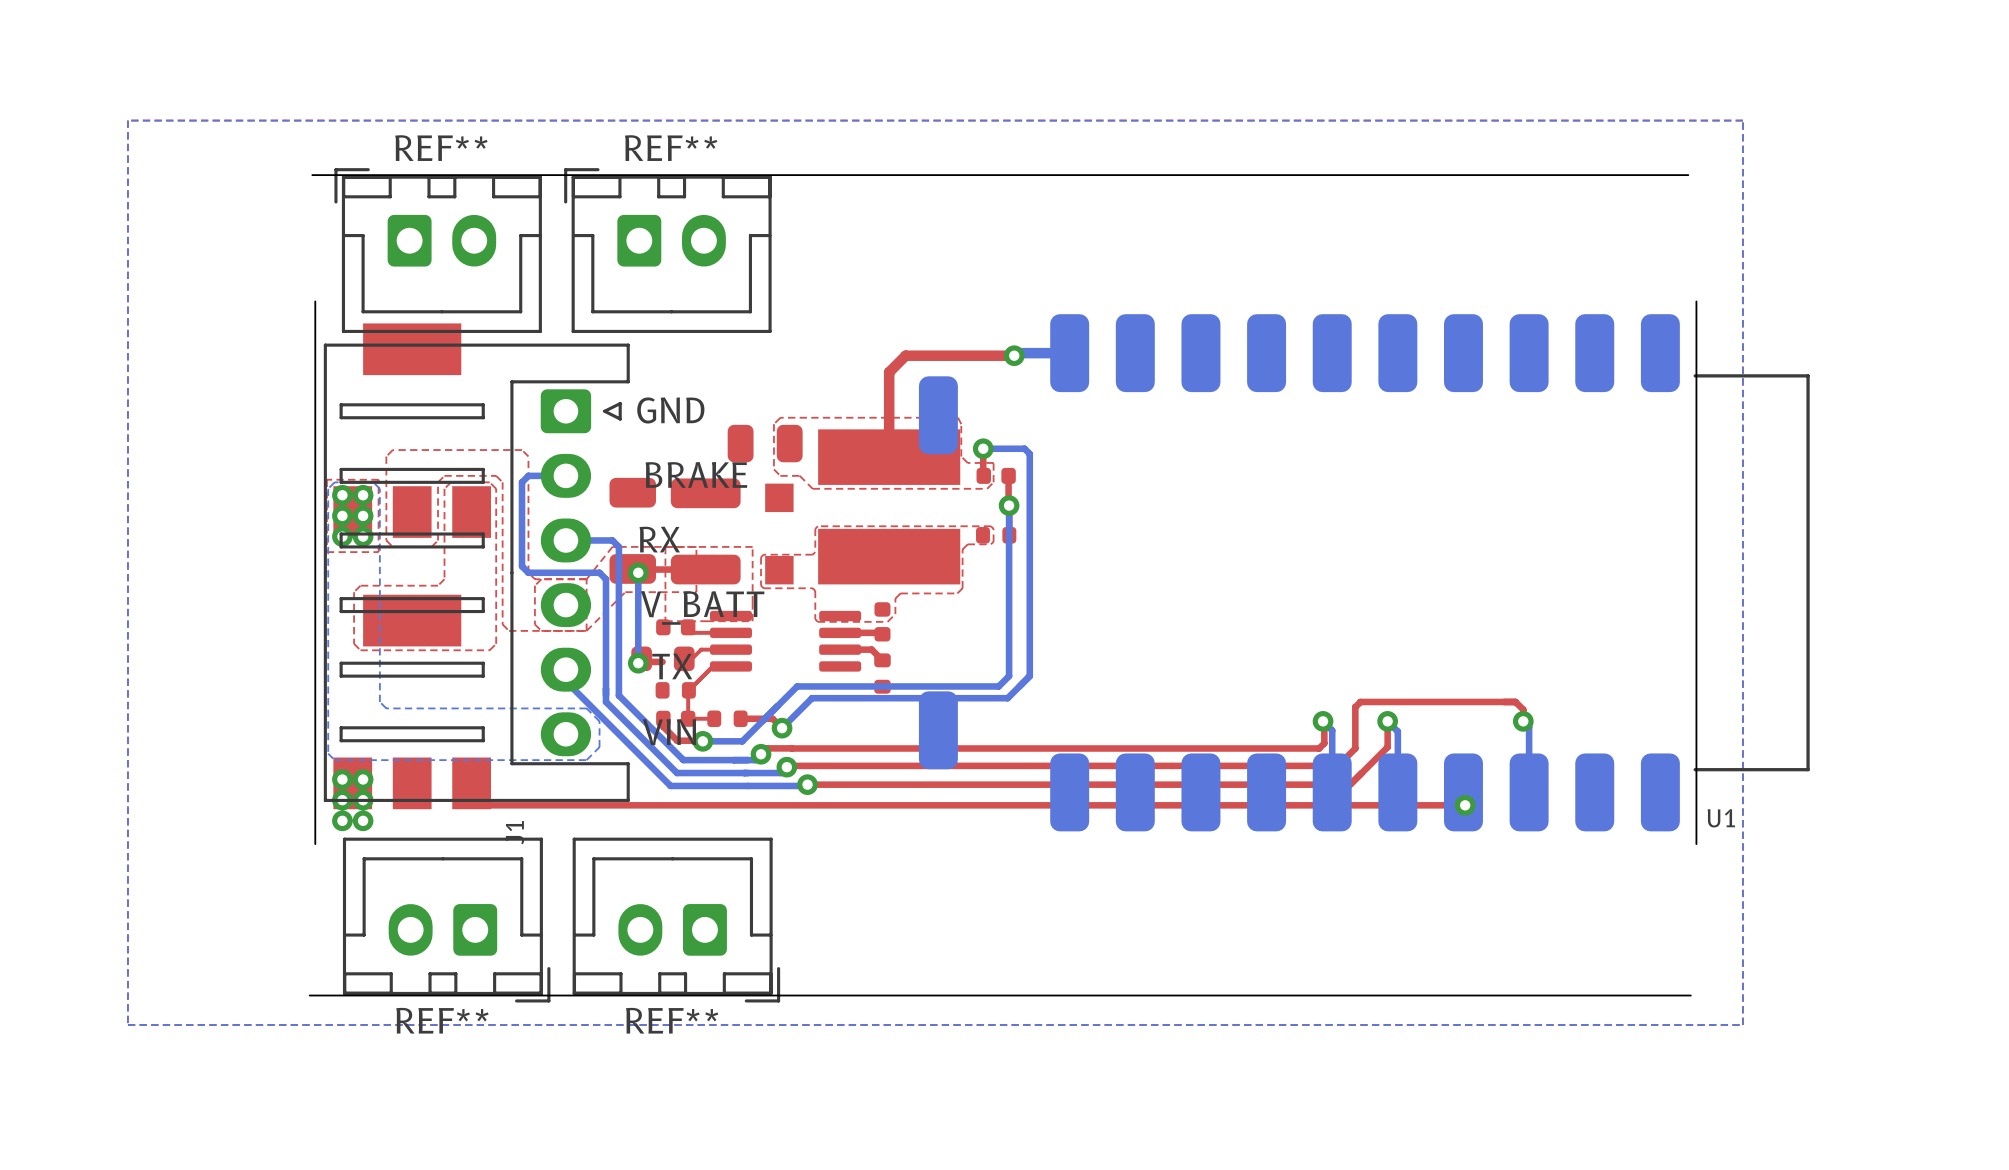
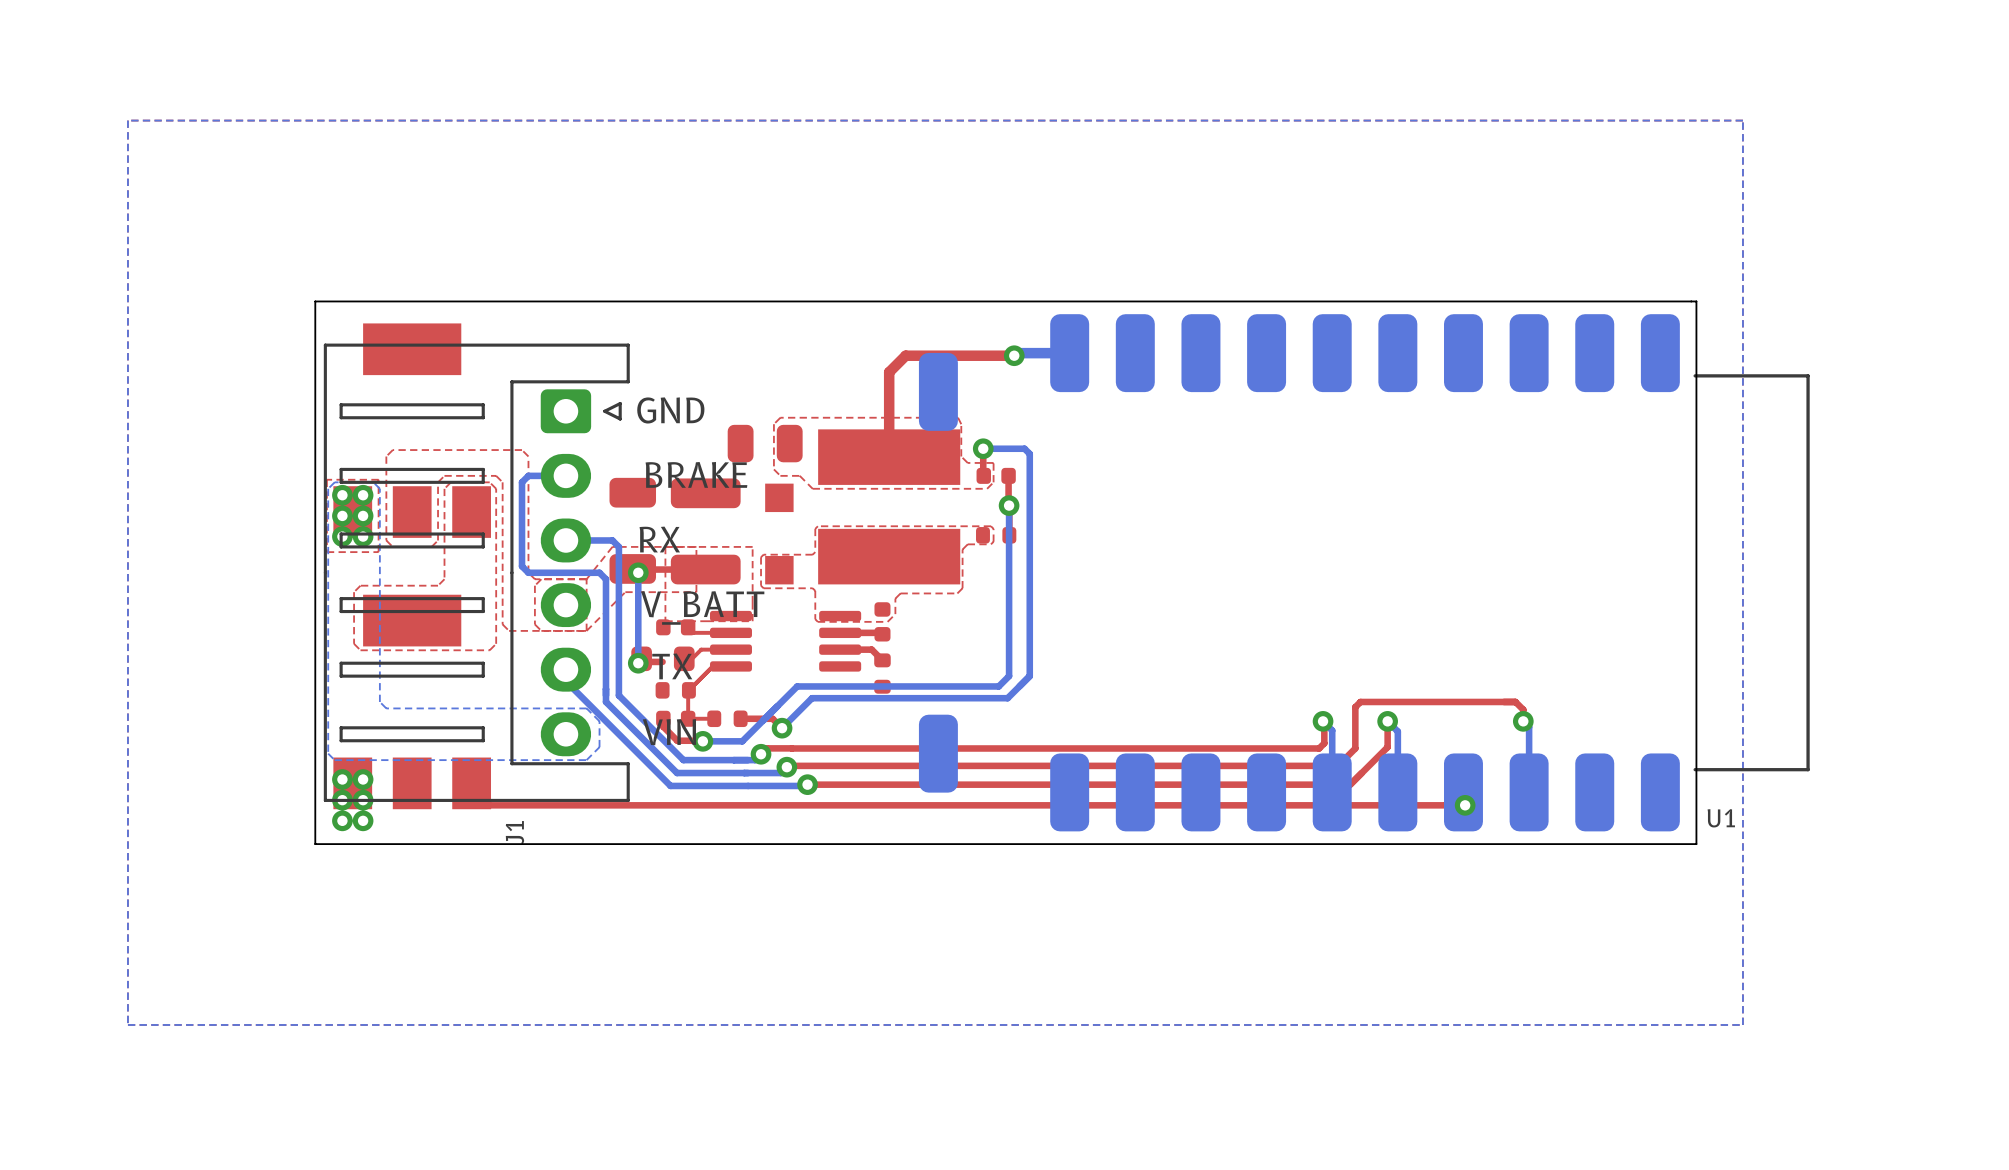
board edge: (1688, 175) (312, 175) -> none
REF**: (438, 250) -> none
REF**: (667, 250) -> none
board edge: none -> (1696, 301) (315, 301)
U1 footprint: [918, 314, 1810, 832] -> [918, 314, 1810, 832]
REF**: (446, 920) -> none
REF**: (676, 920) -> none
board edge: (1690, 995) (309, 995) -> (1696, 844) (315, 844)

